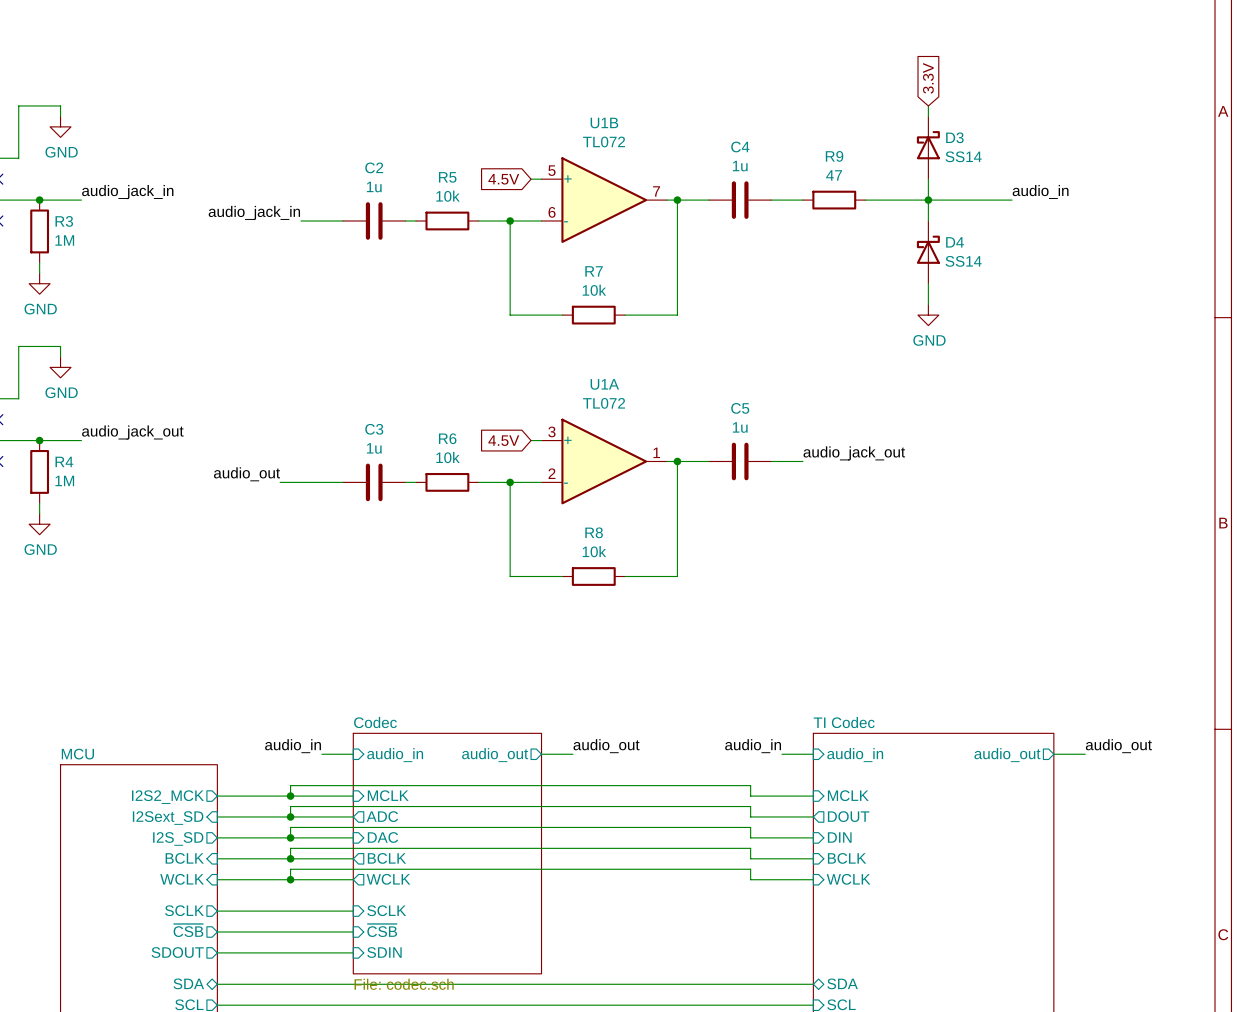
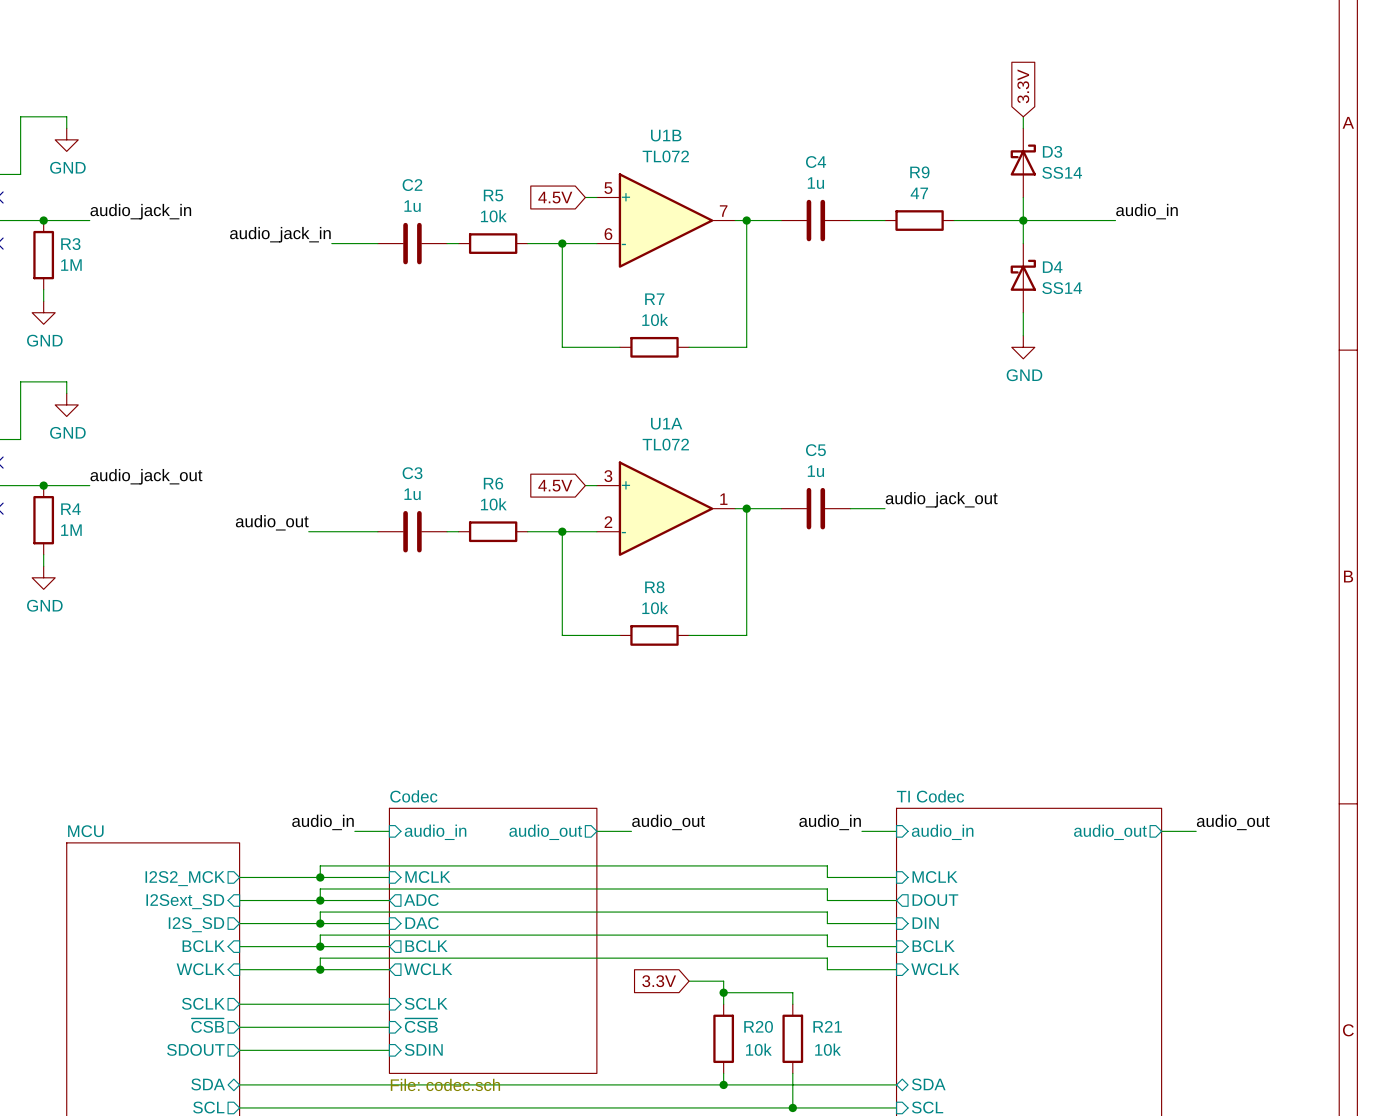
global label: none -> 3.3V (659, 981)
wire: none -> (689, 981) (723, 981) (723, 1004)
wire: none -> (723, 992) (792, 992) (792, 1004)
junction: none -> (723, 992)
R20: none -> 10k (723, 1038)
R21: none -> 10k (792, 1038)
wire: none -> (723, 1073) (723, 1084)
wire: none -> (792, 1073) (792, 1107)
junction: none -> (723, 1084)
junction: none -> (792, 1107)

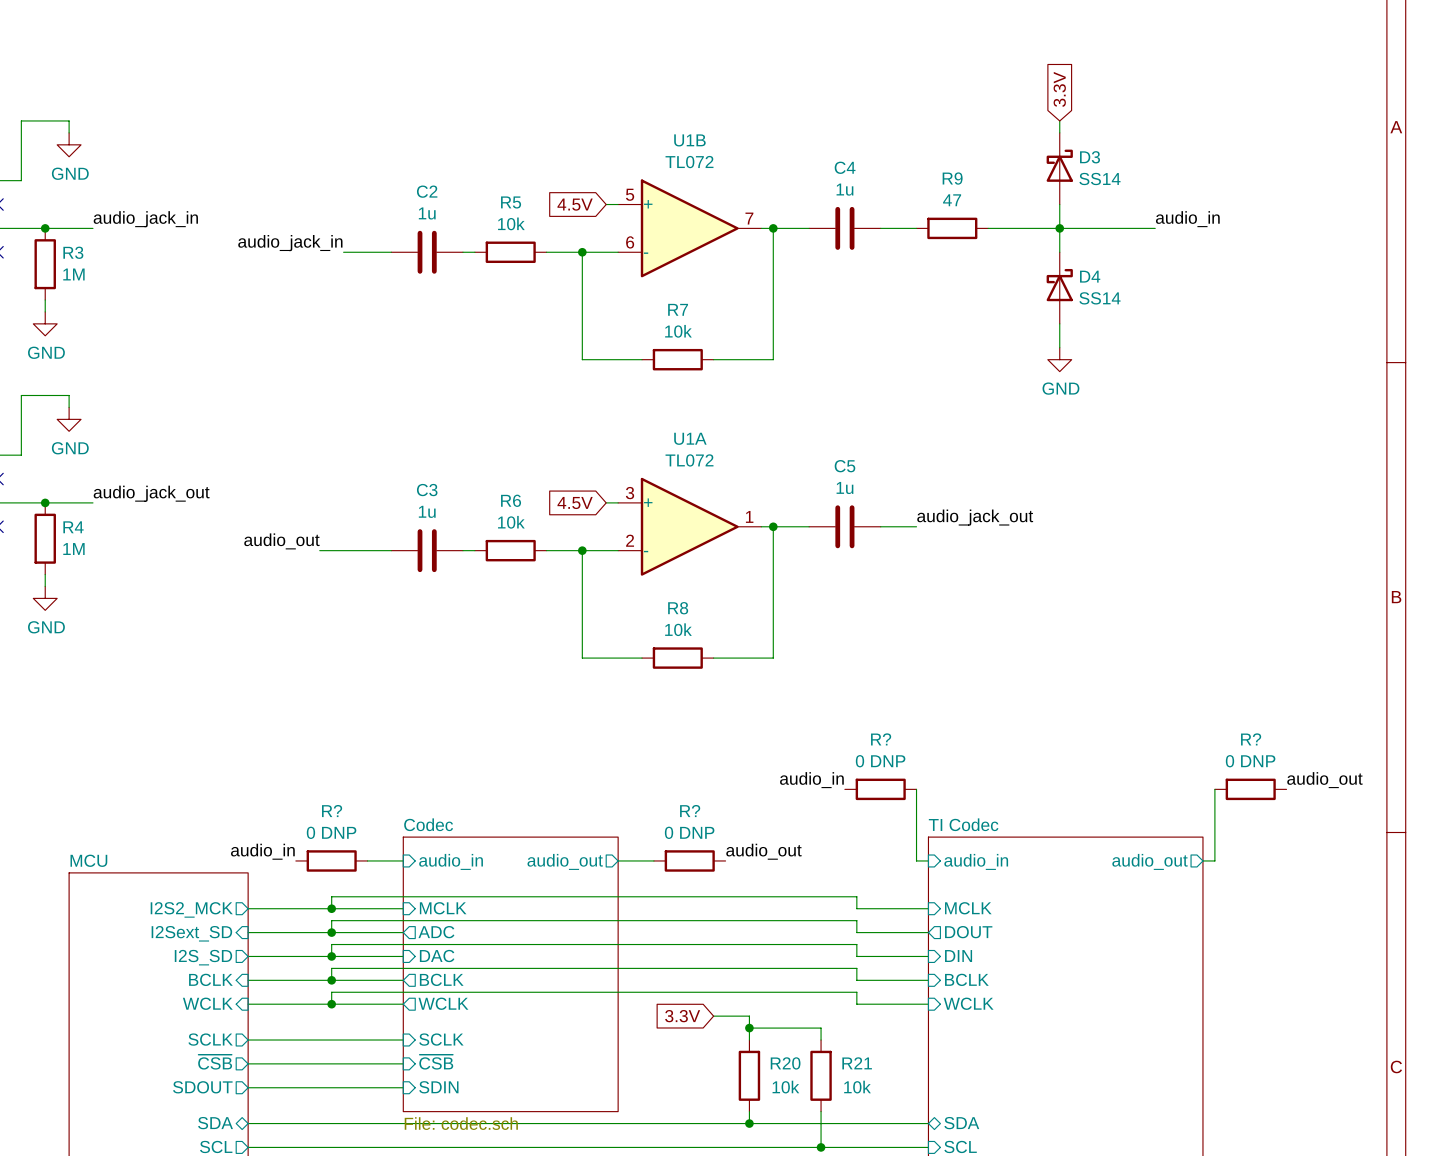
R?: none -> 0 DNP (880, 789)
R?: none -> 0 DNP (1250, 789)
label position: audio_in (322, 822) -> audio_in (262, 851)
label position: audio_out (668, 822) -> audio_out (763, 851)
label position: audio_in (830, 822) -> audio_in (811, 780)
label position: audio_out (1233, 822) -> audio_out (1324, 780)
R?: none -> 0 DNP (331, 860)
R?: none -> 0 DNP (689, 860)
wire: (861, 831) (885, 831) -> (916, 789) (916, 860)
wire: (1173, 831) (1196, 831) -> (1214, 860) (1214, 789)

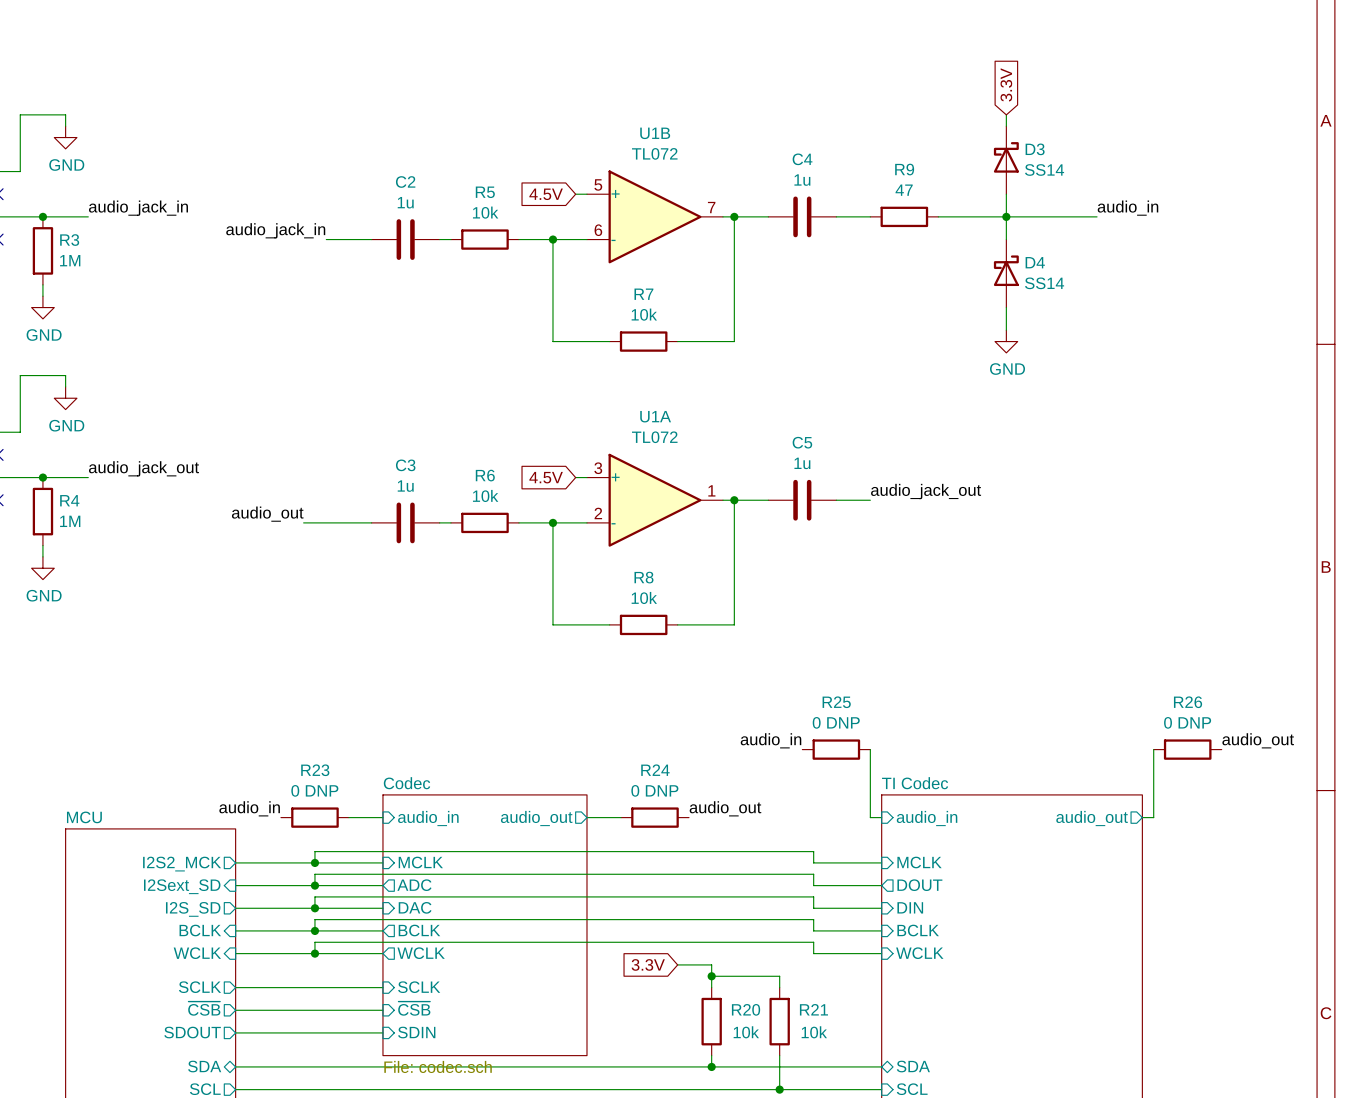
R? name: R? (881, 739) -> R25 (836, 702)
R? name: R? (1251, 739) -> R26 (1188, 702)
R? name: R? (332, 811) -> R23 (315, 770)
R? name: R? (690, 811) -> R24 (655, 770)

